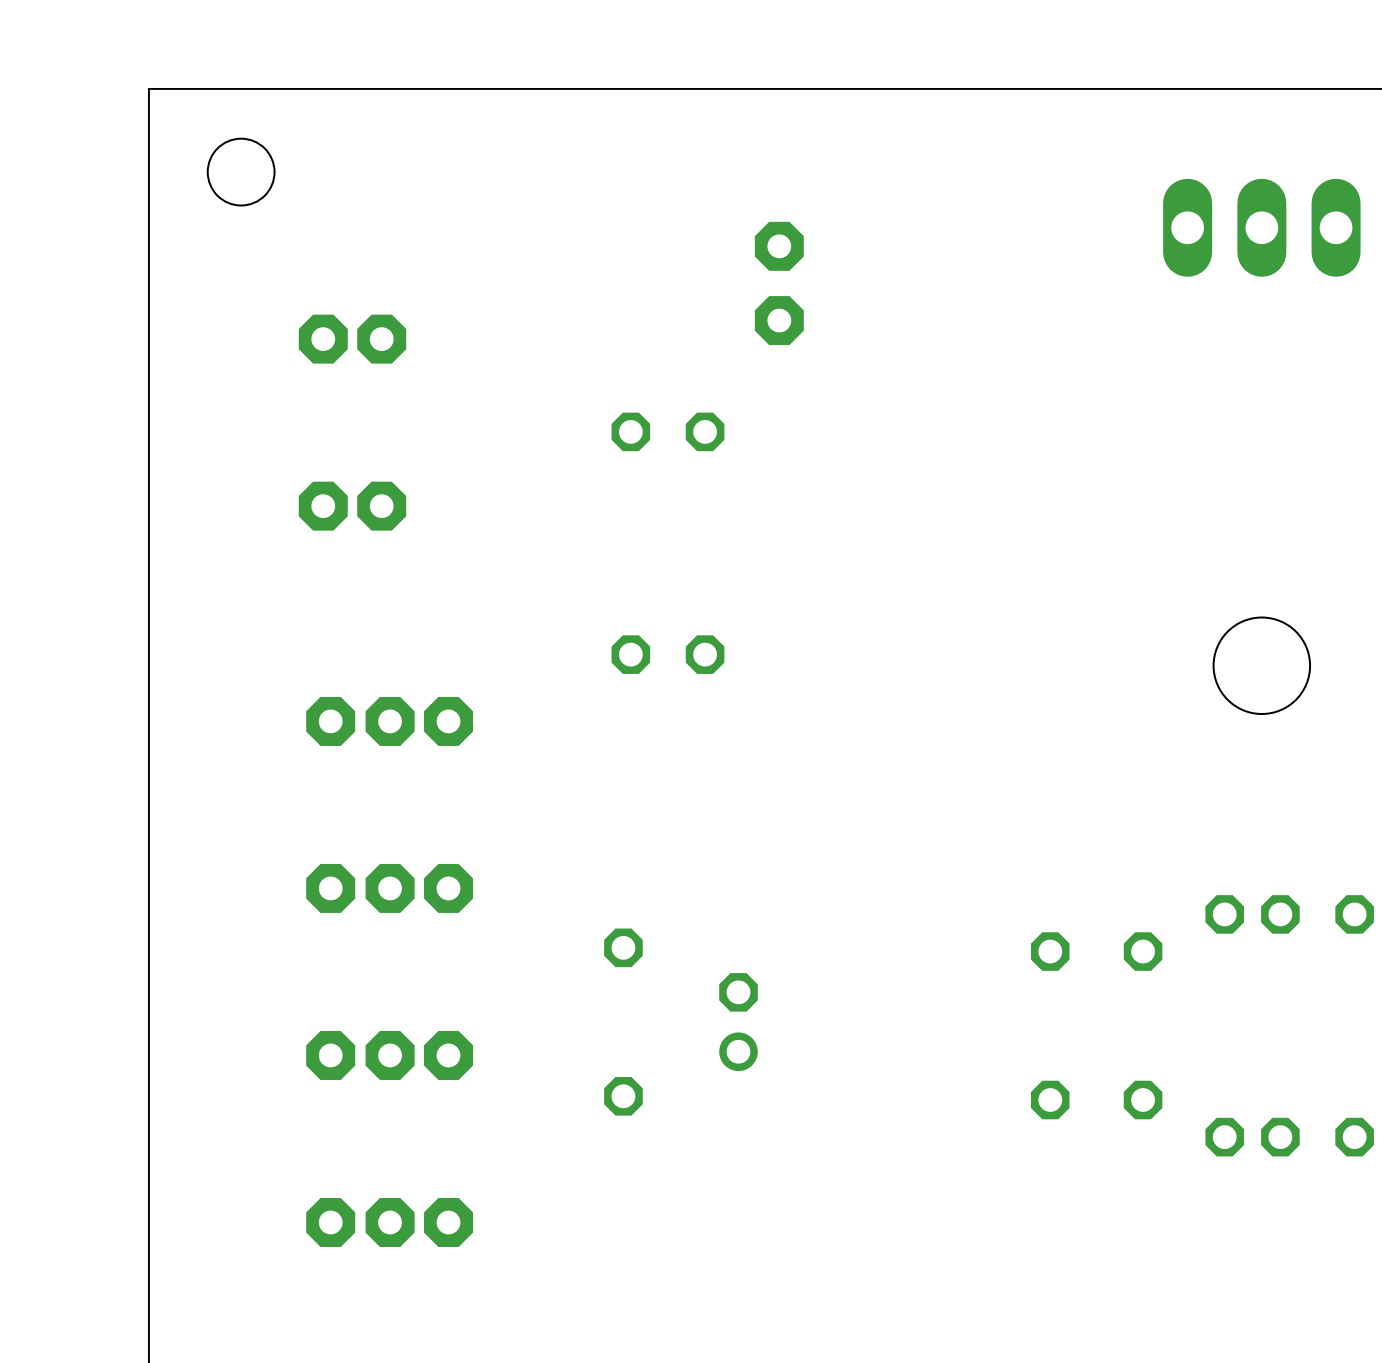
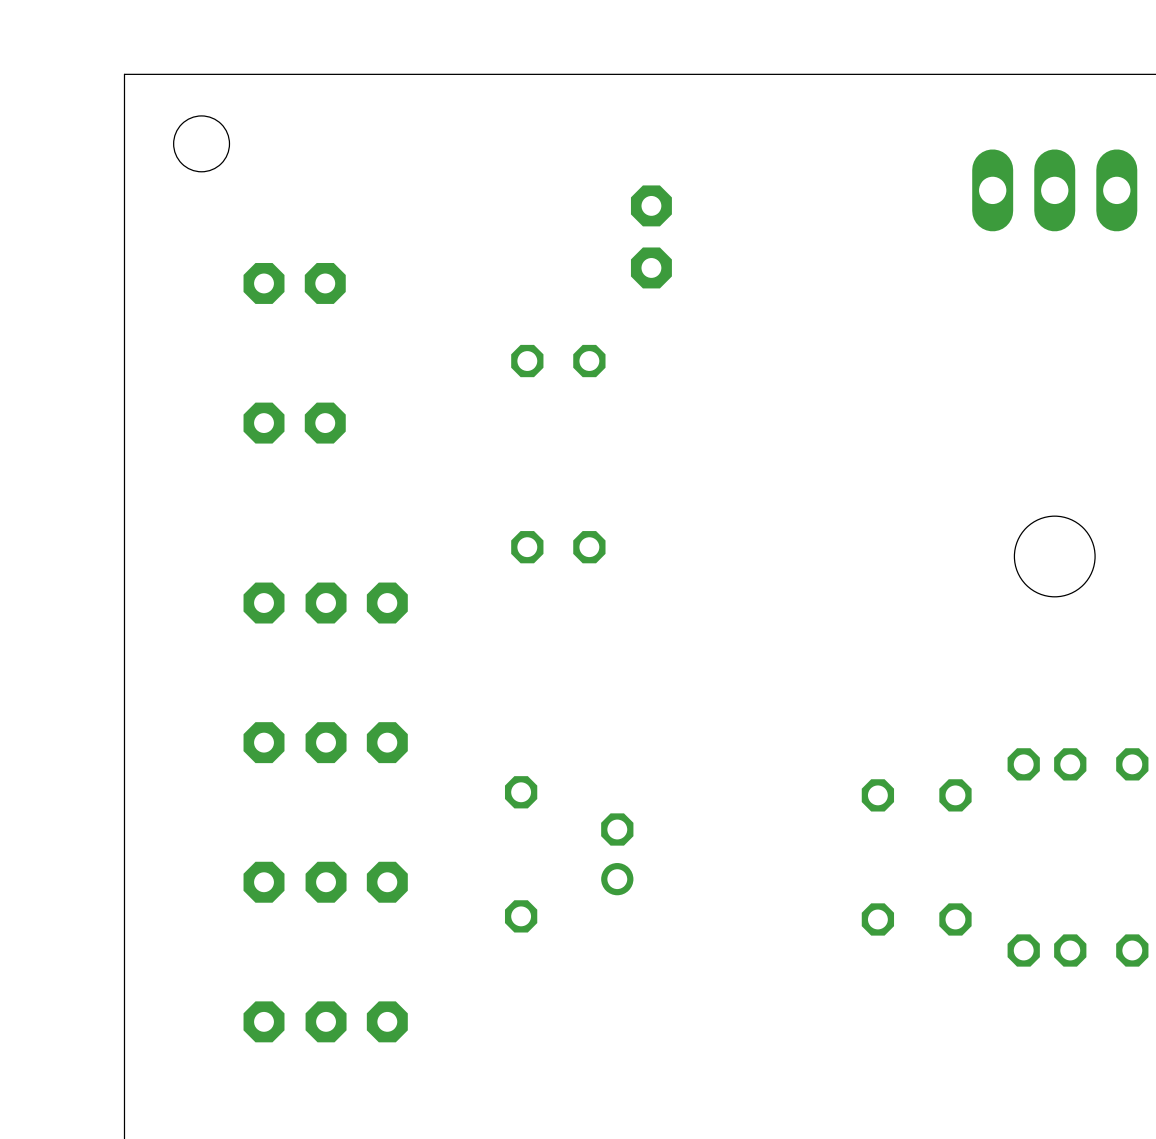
part footprint: [298, 314, 407, 364] -> [243, 262, 346, 304]
part footprint: [298, 481, 407, 531] -> [243, 402, 346, 444]
part footprint: [306, 696, 474, 746] -> [243, 582, 408, 624]
part footprint: [306, 863, 474, 913] -> [243, 722, 408, 764]
part footprint: [306, 1030, 474, 1080] -> [243, 861, 408, 903]
part footprint: [306, 1198, 474, 1247] -> [243, 1001, 408, 1043]

